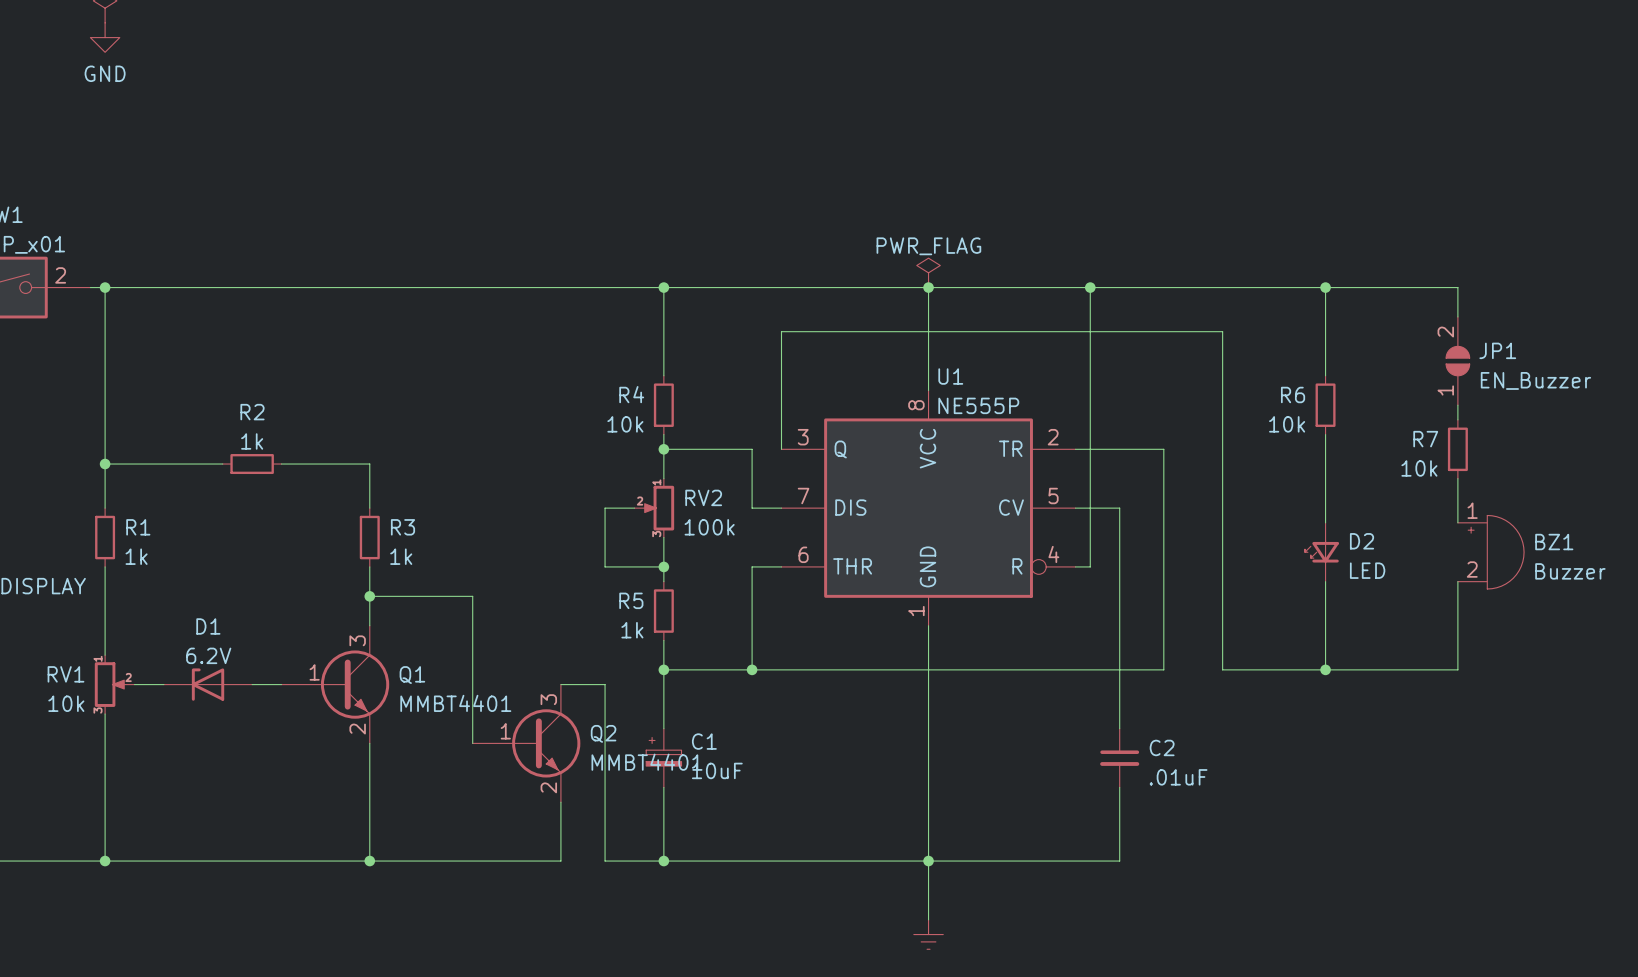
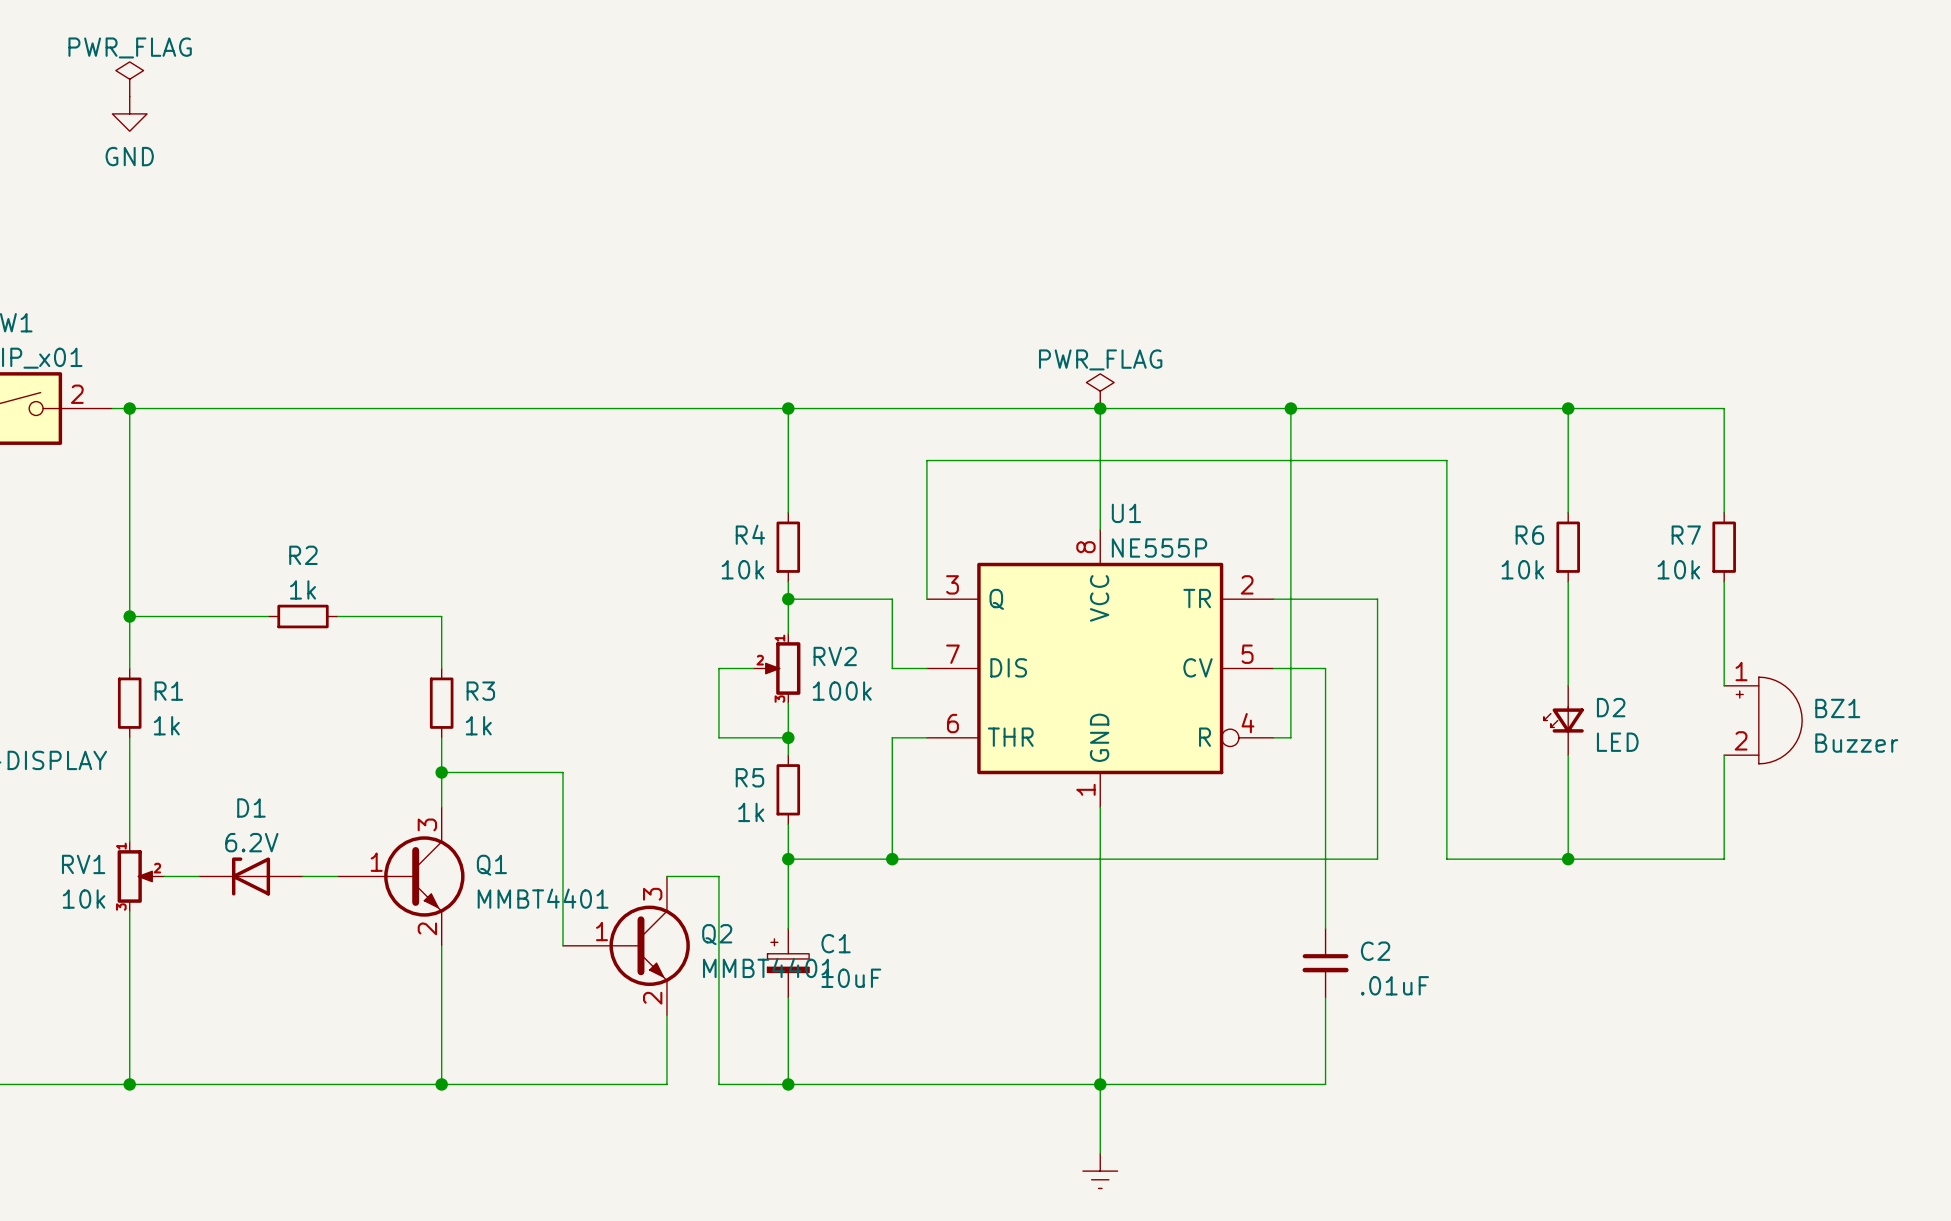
JP1: EN_Buzzer (1457, 361) -> none
wire: (1457, 405) (1457, 419) -> none
wire: none -> (1724, 581) (1724, 633)
R7 position: (1457, 449) -> (1724, 547)

